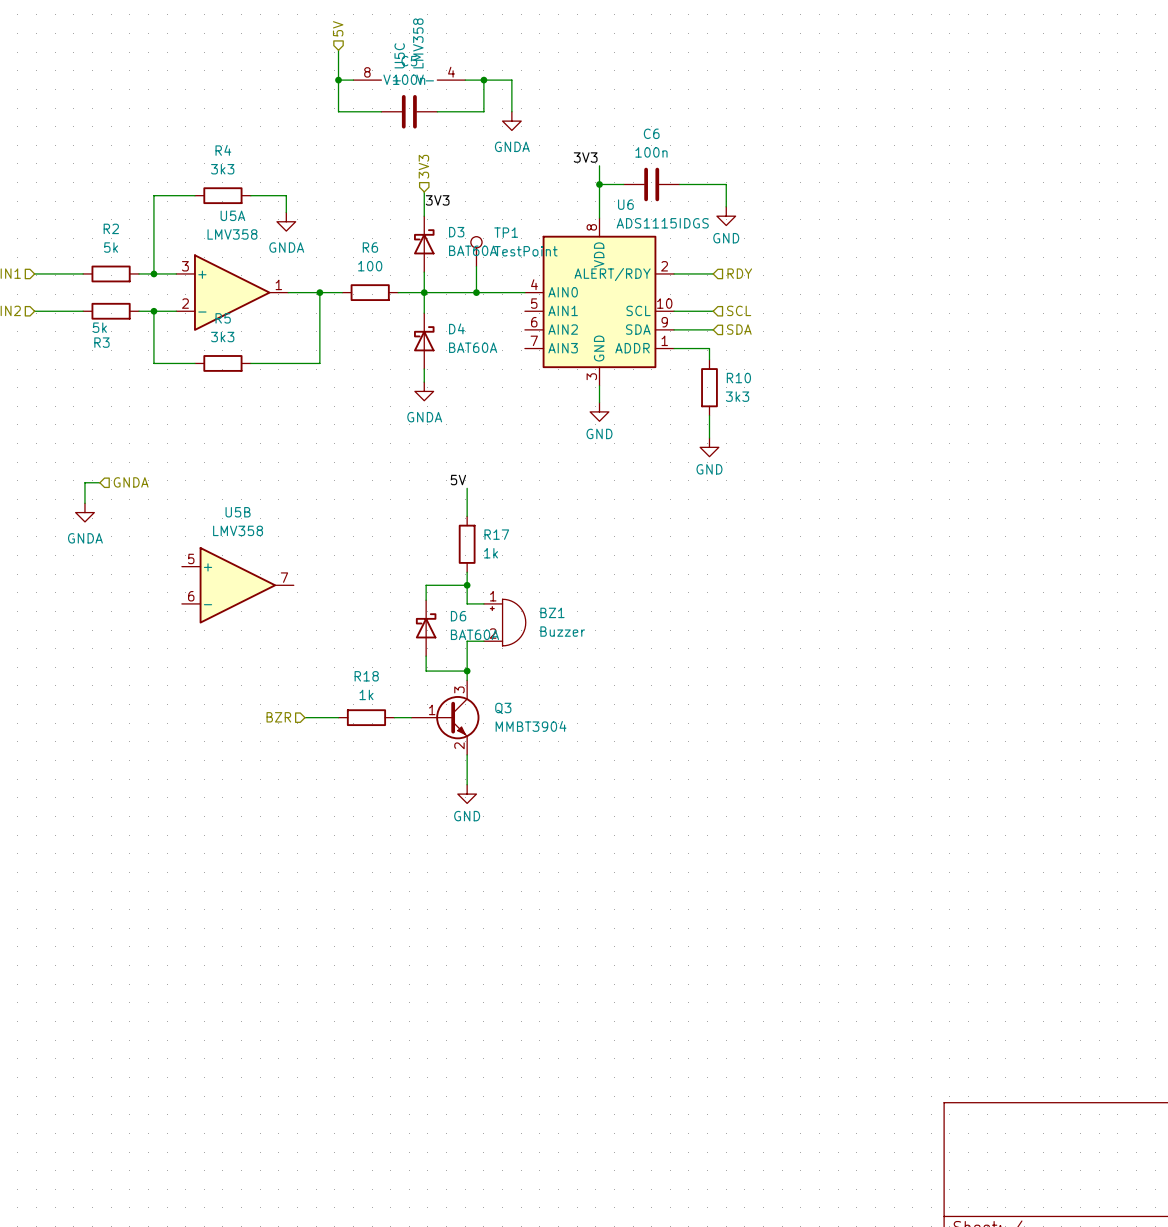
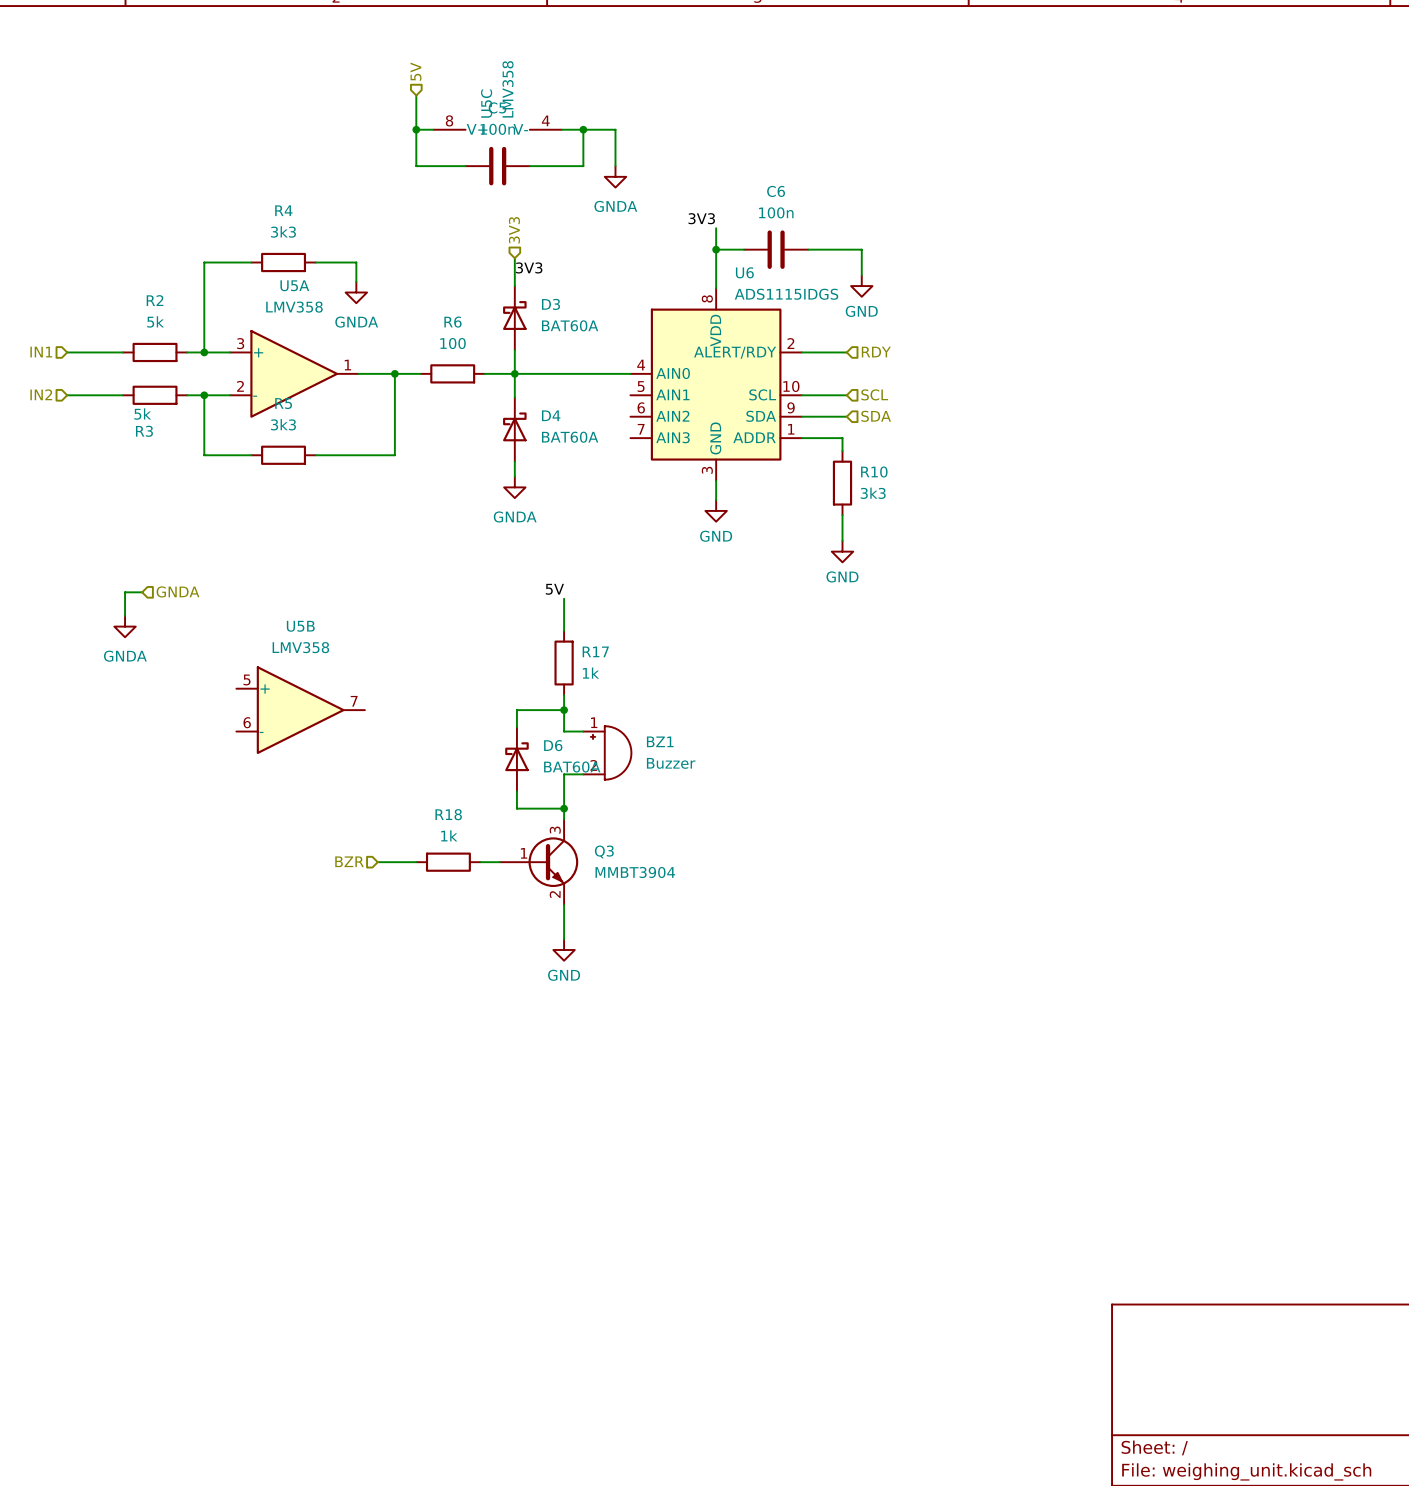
TP1: TestPoint (476, 251) -> none
wire: (476, 266) (476, 292) -> none
junction: (476, 292) -> none

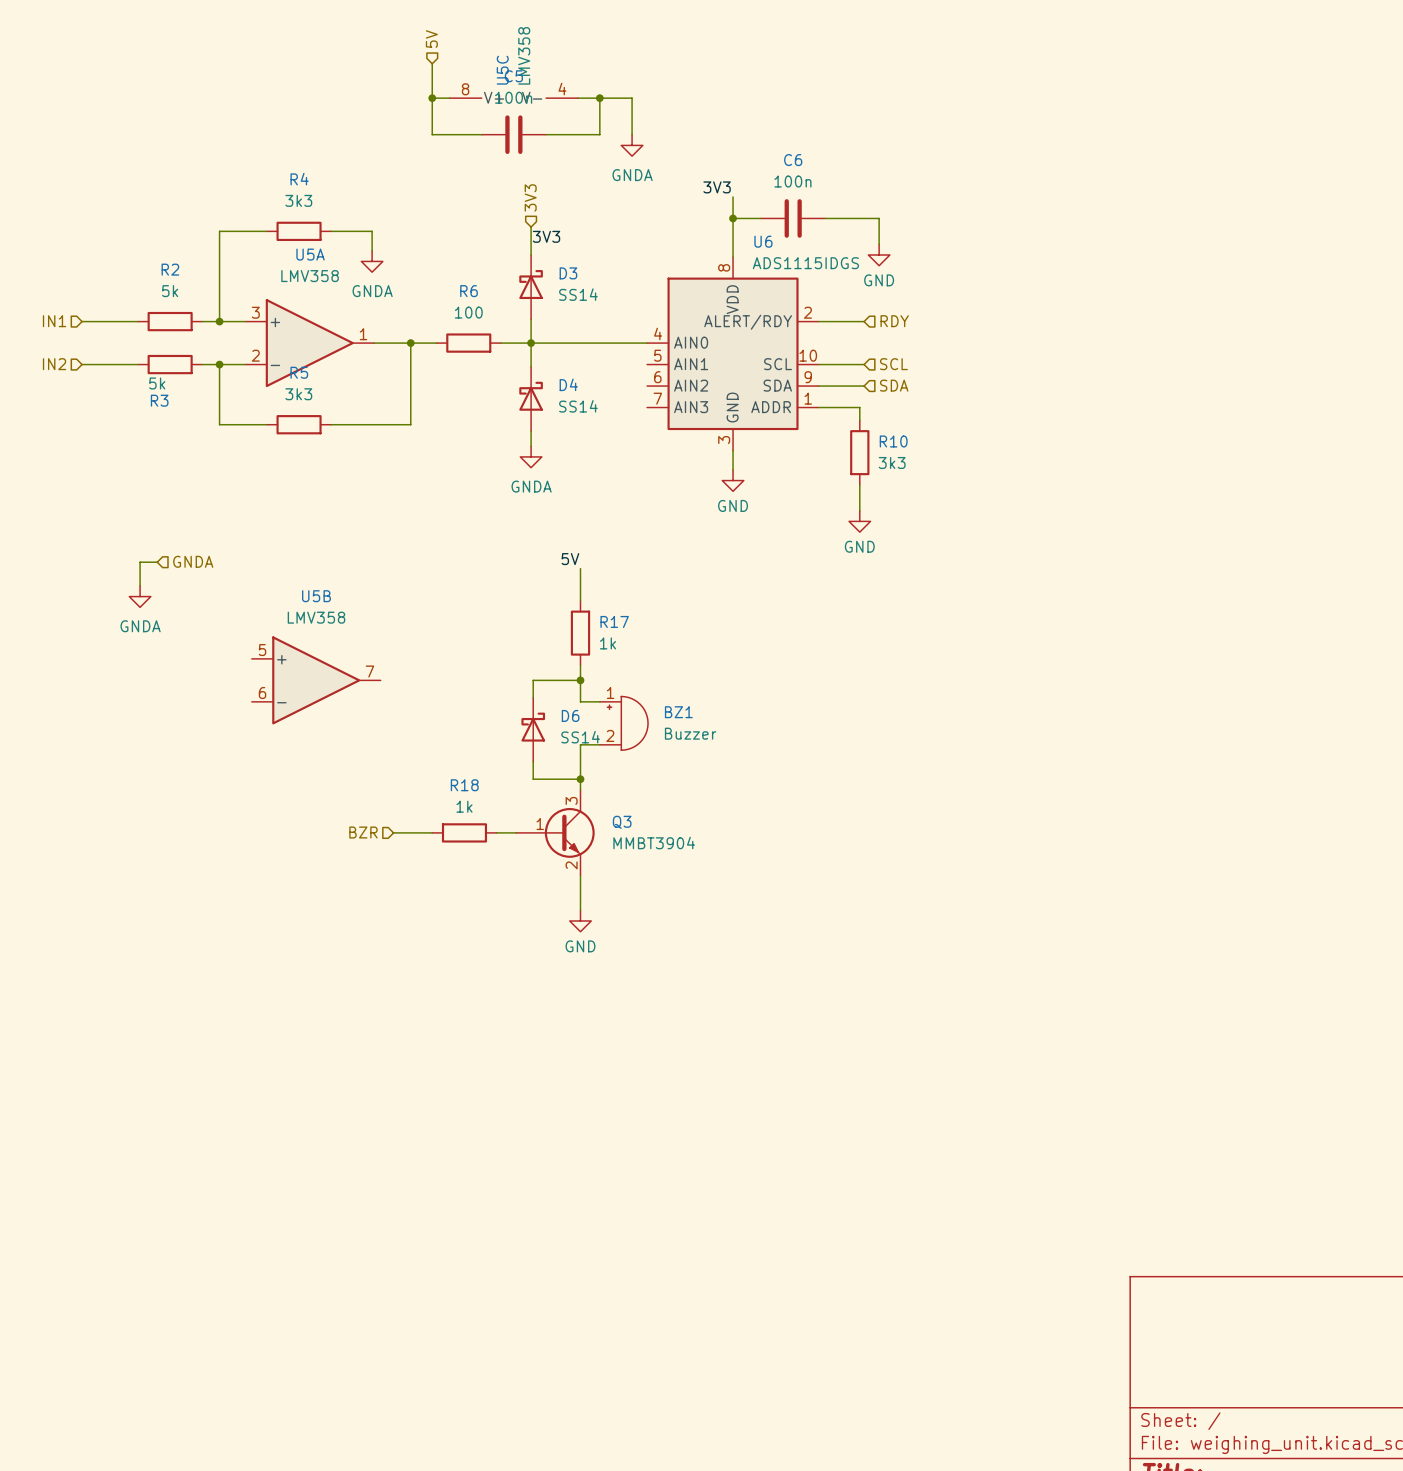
D3 value: BAT60A (570, 325) -> SS14 (578, 294)
D4 value: BAT60A (570, 437) -> SS14 (578, 406)
D6 value: BAT60A (572, 767) -> SS14 (580, 737)

